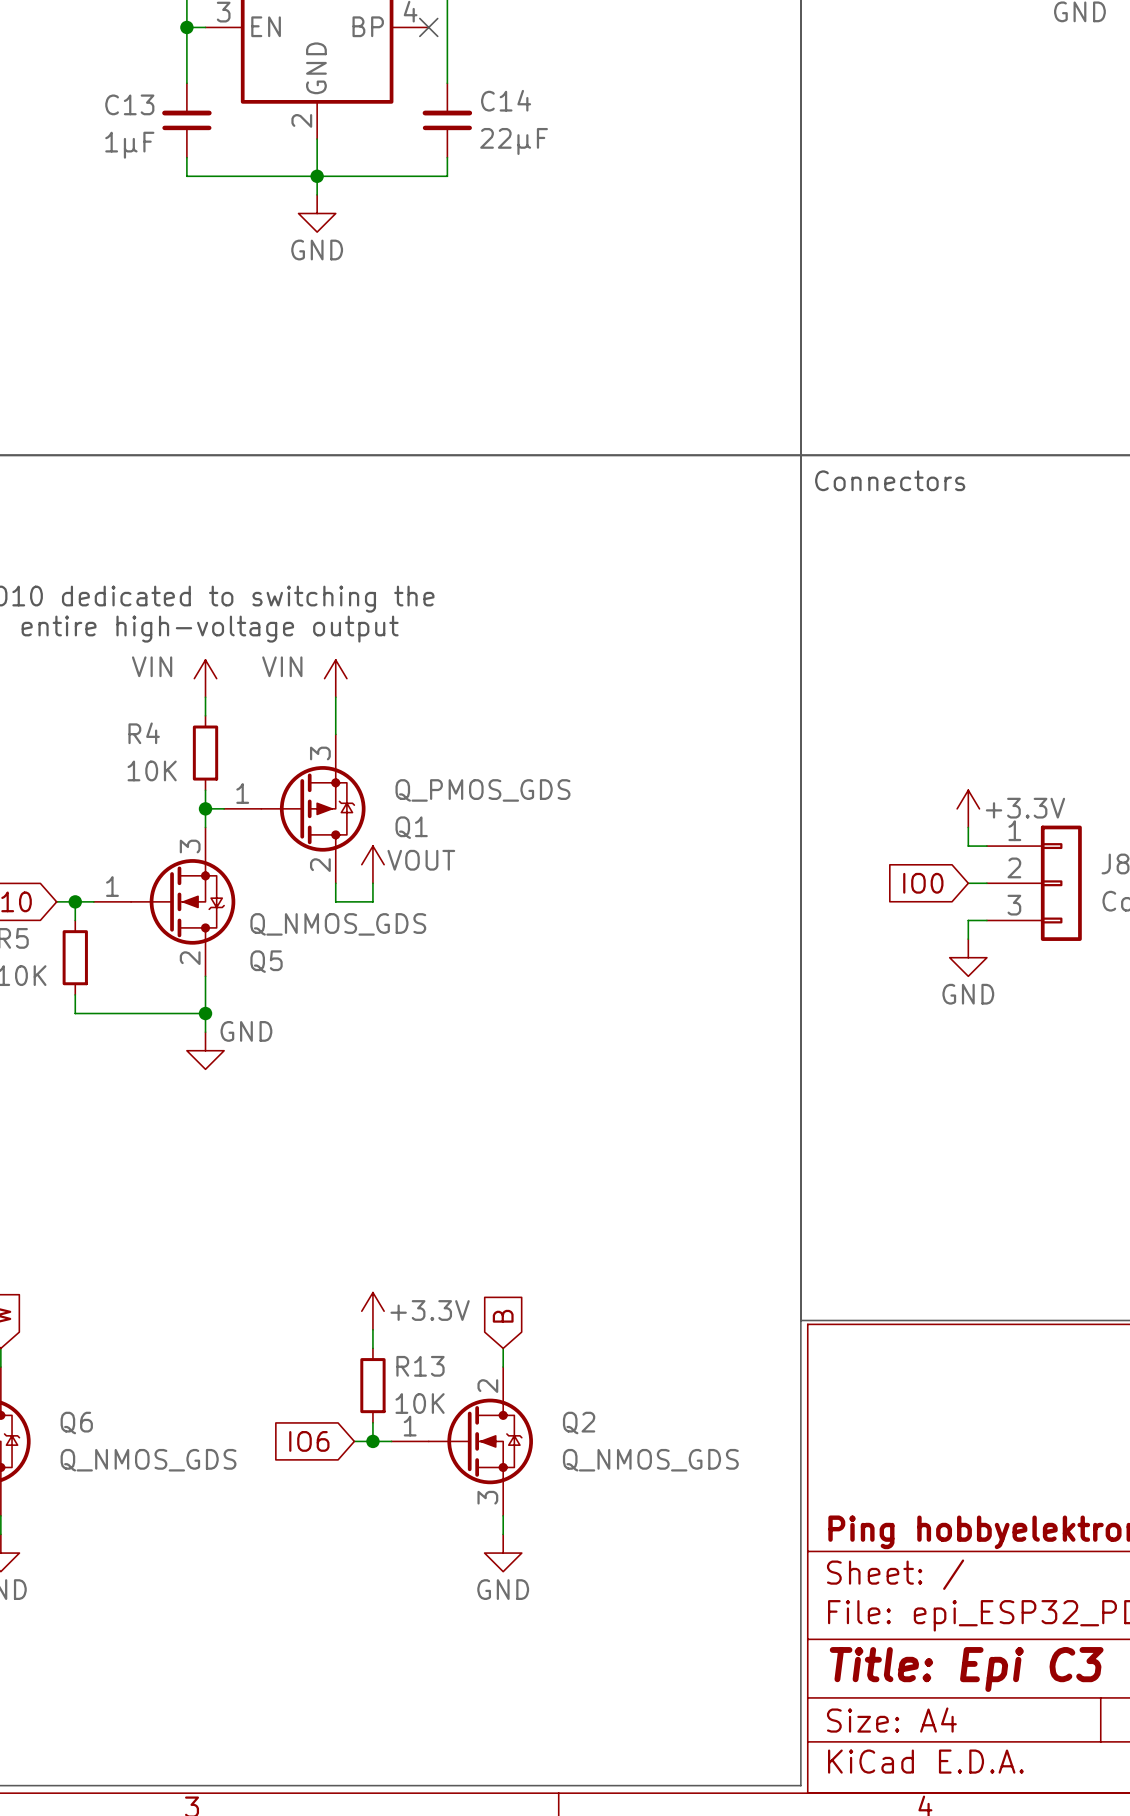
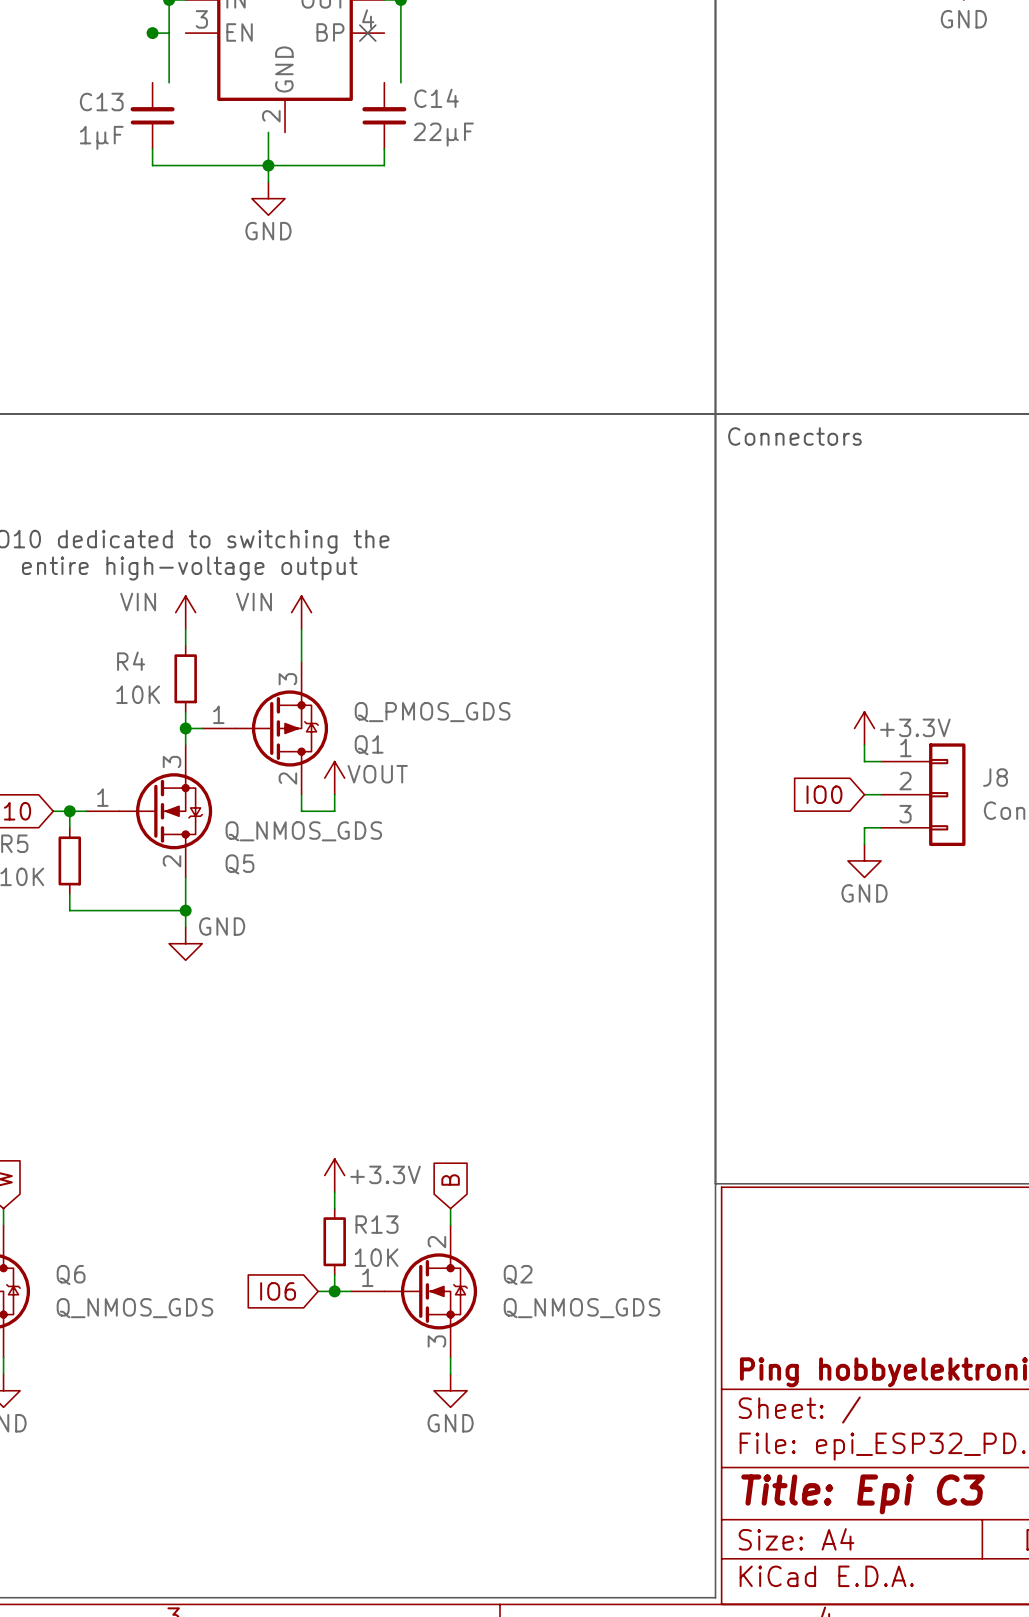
wire: (186, 27) (205, 27) -> (169, 33) (152, 33)
junction position: (186, 27) -> (152, 33)
no-connect mark position: (428, 27) -> (367, 33)
C13 position: (186, 120) -> (152, 115)
C14 position: (447, 120) -> (384, 115)
wire: (317, 139) (317, 194) -> (268, 132) (268, 182)
wire: (186, 157) (186, 176) -> (152, 148) (152, 165) (169, 165)
wire: (447, 157) (447, 176) (428, 176) -> (384, 148) (384, 165)
junction position: (317, 176) -> (268, 165)
power symbol position: GND (317, 213) -> GND (268, 198)

